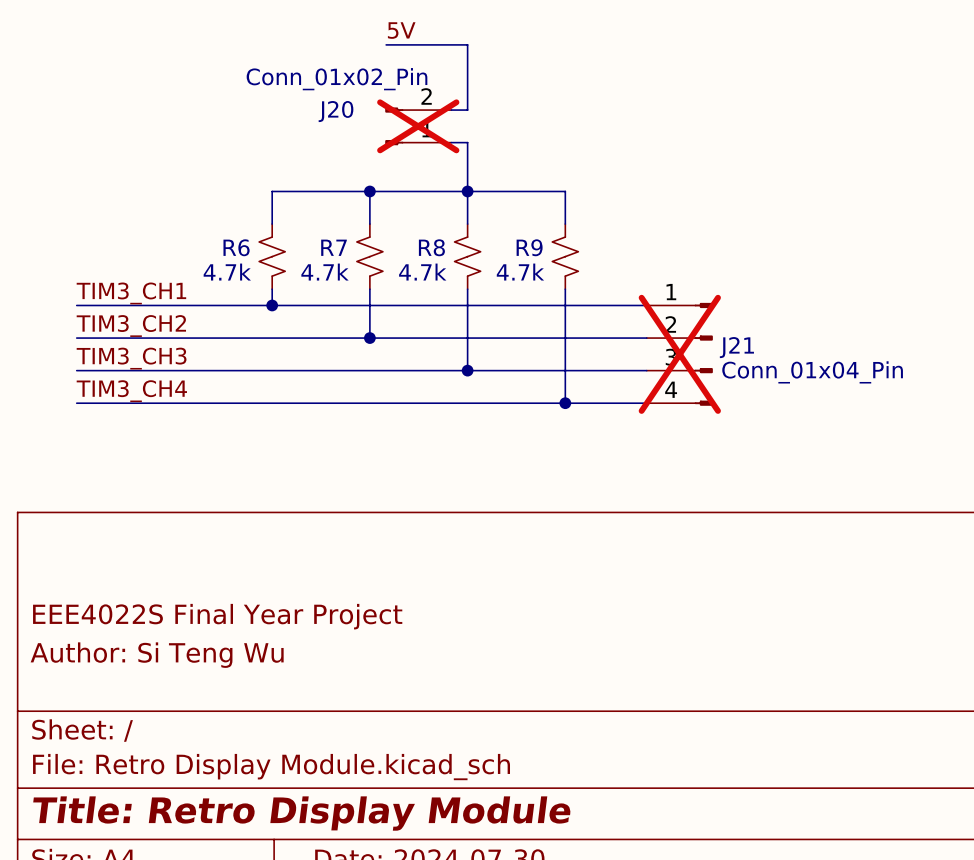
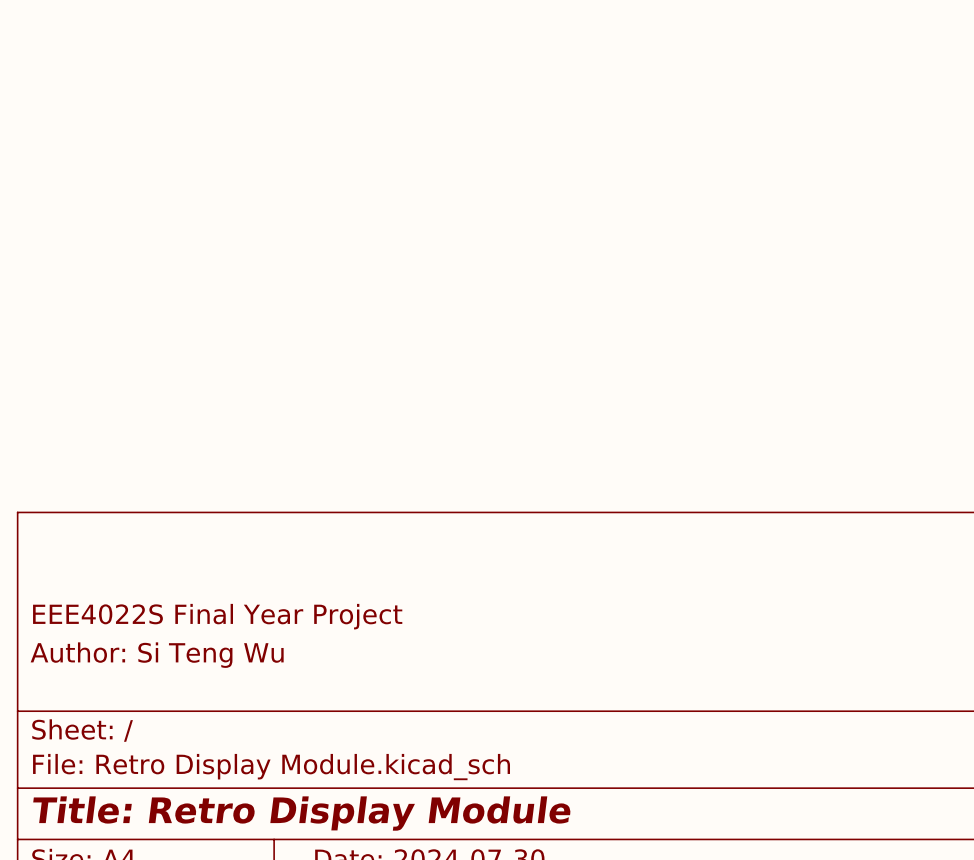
label: 5V (401, 30) -> none
wire: (386, 44) (467, 44) (467, 110) (451, 110) -> none
J20: Conn_01x02_Pin (418, 126) -> none
wire: (451, 142) (467, 142) (467, 224) -> none
wire: (369, 191) (369, 224) -> none
junction: (369, 191) -> none
junction: (467, 191) -> none
wire: (272, 224) (272, 191) (565, 191) (565, 224) -> none
R6: 4.7k (272, 256) -> none
R7: 4.7k (369, 256) -> none
R8: 4.7k (467, 256) -> none
R9: 4.7k (565, 256) -> none
wire: (272, 289) (272, 305) -> none
wire: (369, 289) (369, 338) -> none
wire: (467, 289) (467, 370) -> none
wire: (565, 289) (565, 403) -> none
label: TIM3_CH1 (131, 293) -> none
wire: (76, 305) (646, 305) -> none
junction: (272, 305) -> none
label: TIM3_CH2 (131, 326) -> none
wire: (76, 338) (646, 338) -> none
junction: (369, 338) -> none
J21: Conn_01x04_Pin (679, 354) -> none
label: TIM3_CH3 (131, 358) -> none
wire: (76, 370) (646, 370) -> none
junction: (467, 370) -> none
label: TIM3_CH4 (131, 391) -> none
wire: (76, 403) (646, 403) -> none
junction: (565, 403) -> none

